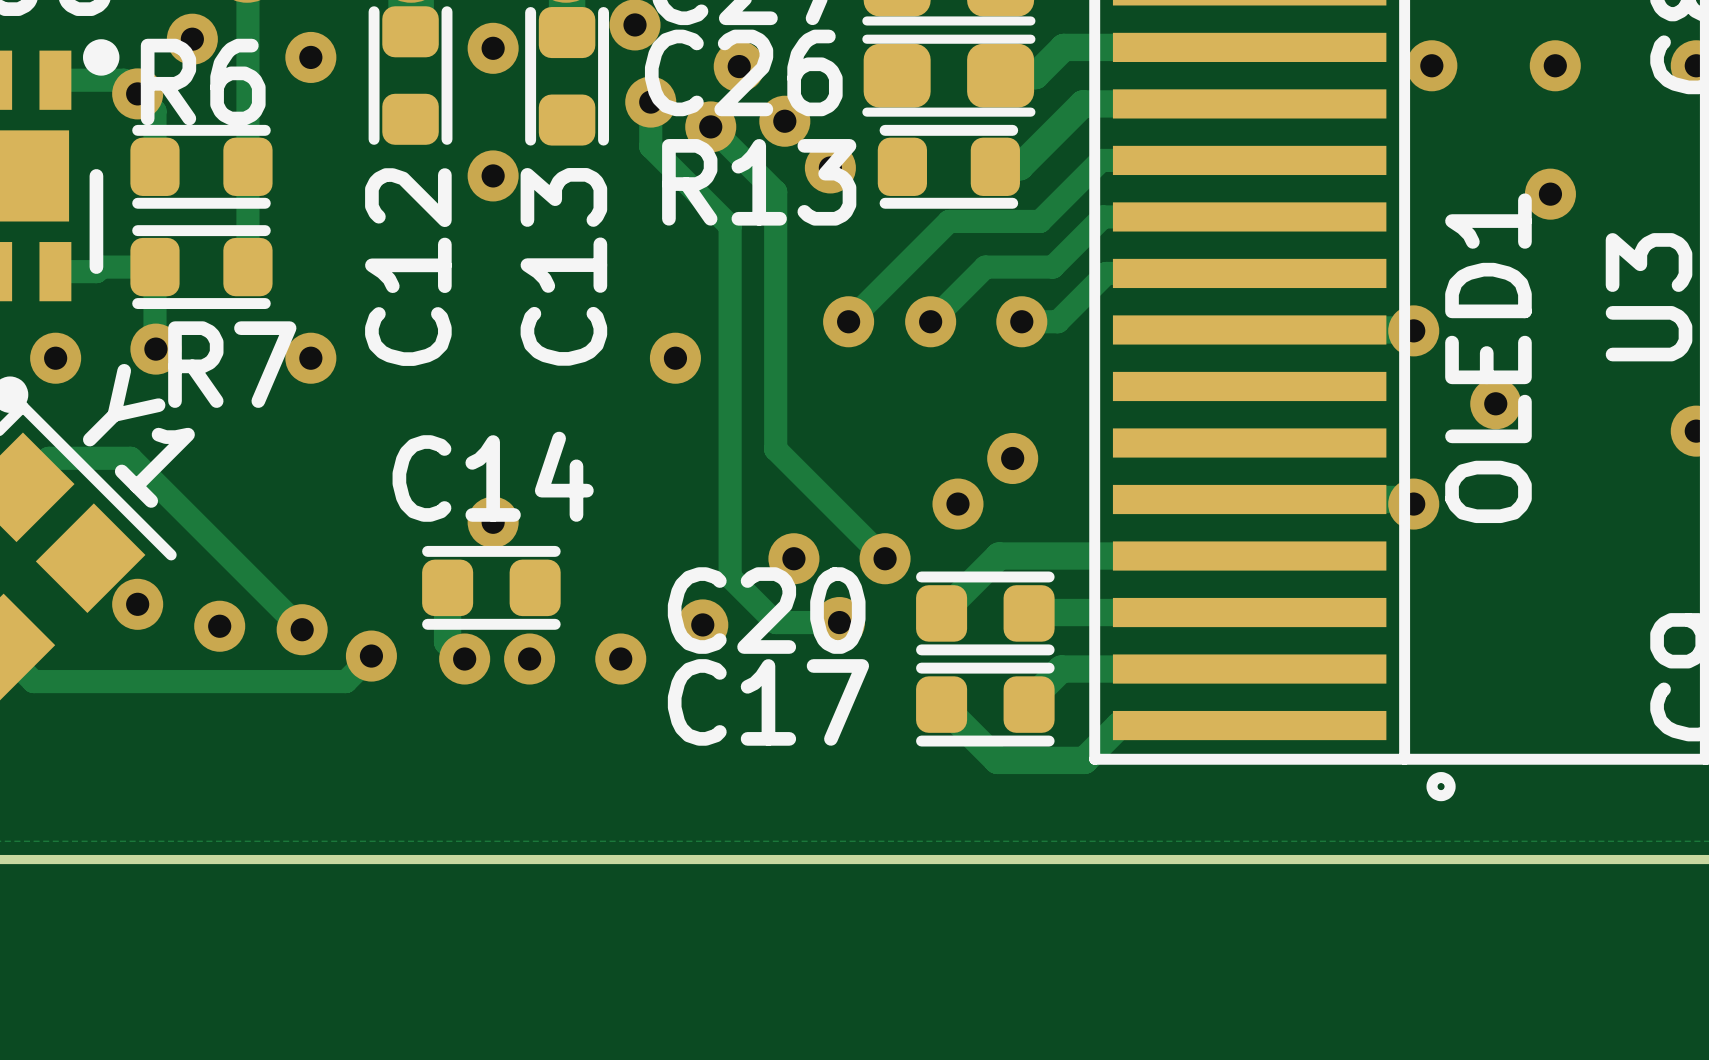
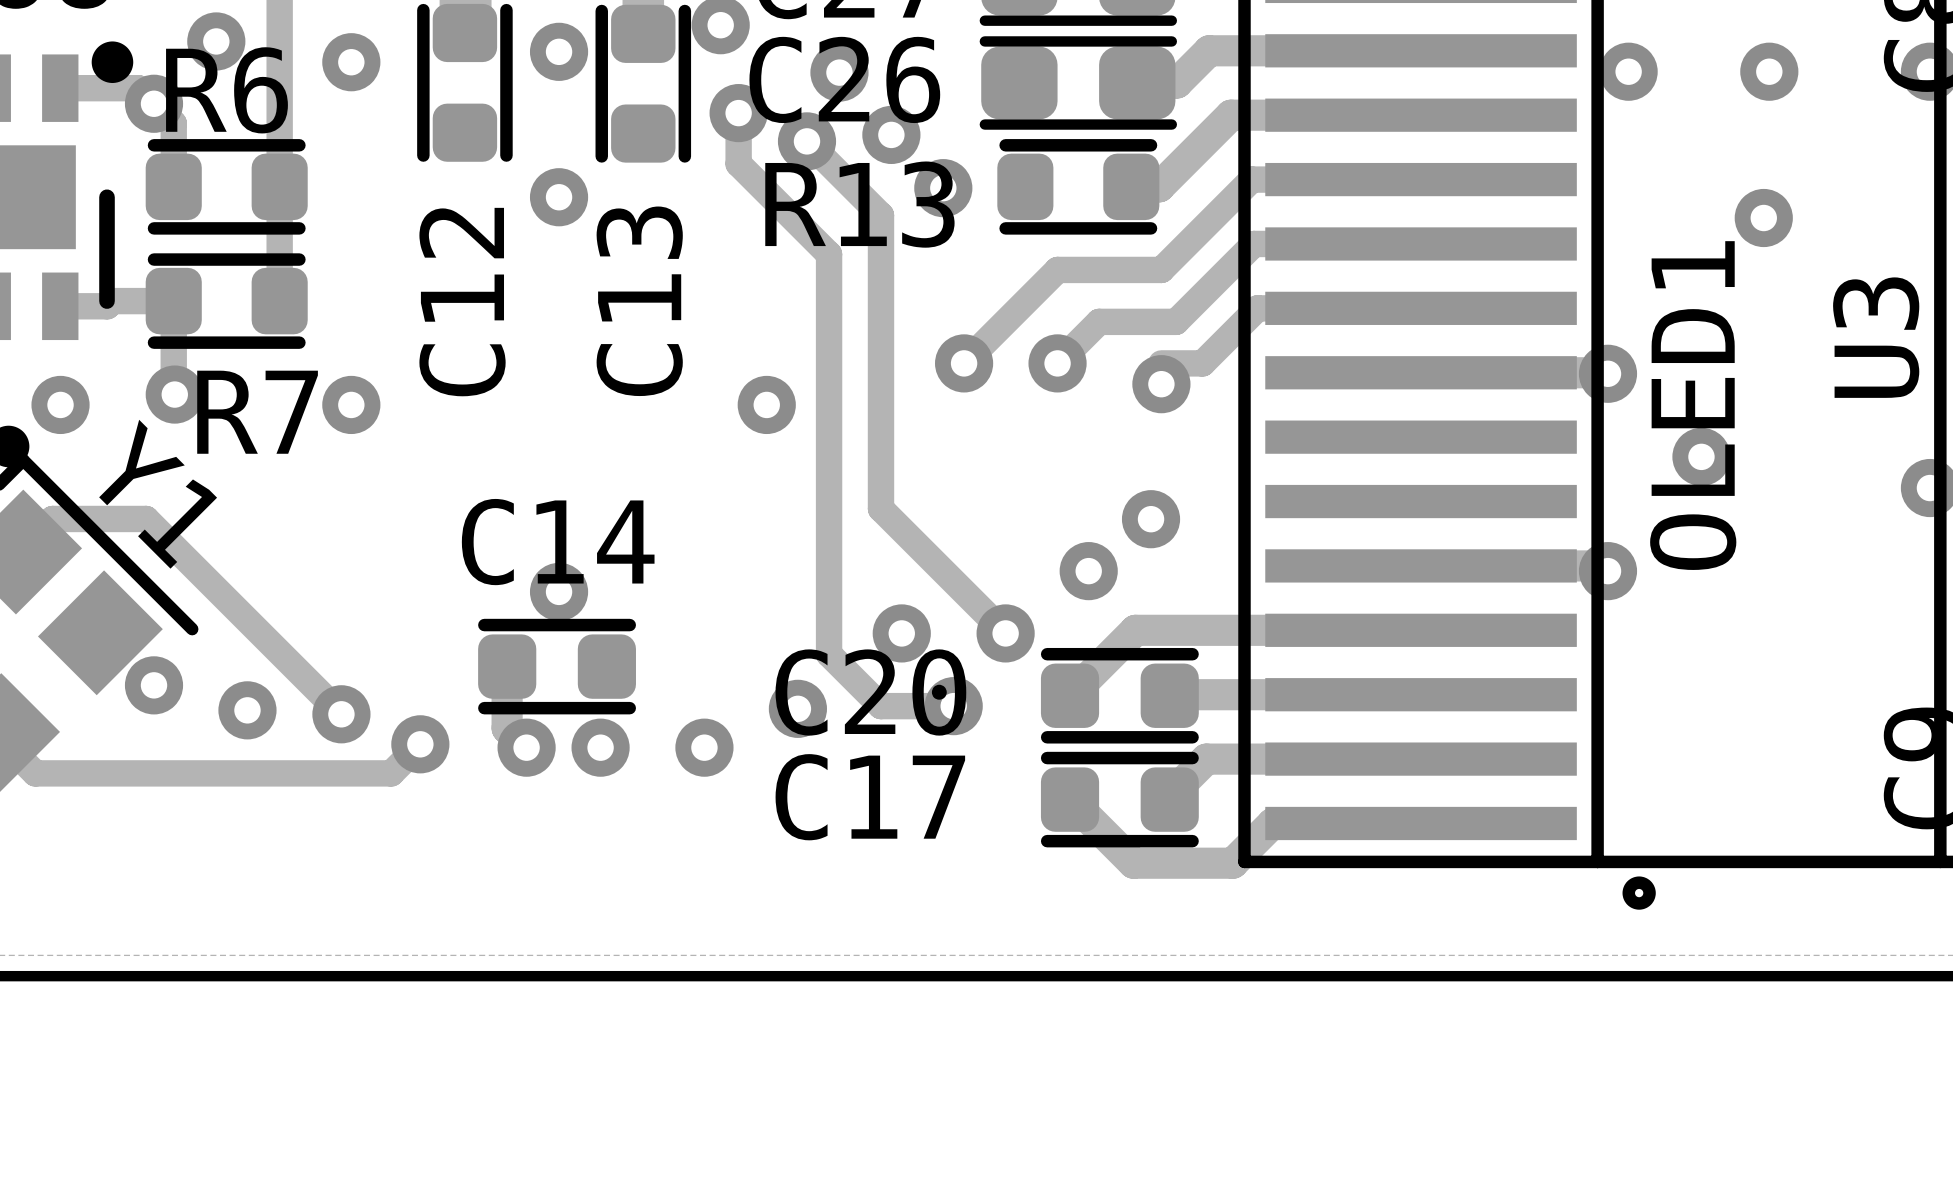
track: (1040, 221) (948, 221) (930, 239) -> (1182, 249) (1161, 269) (1057, 269)
track: (1052, 267) (985, 267) (967, 285) -> (1196, 301) (1176, 321) (1099, 321)
via position: (1021, 321) -> (1161, 384)

